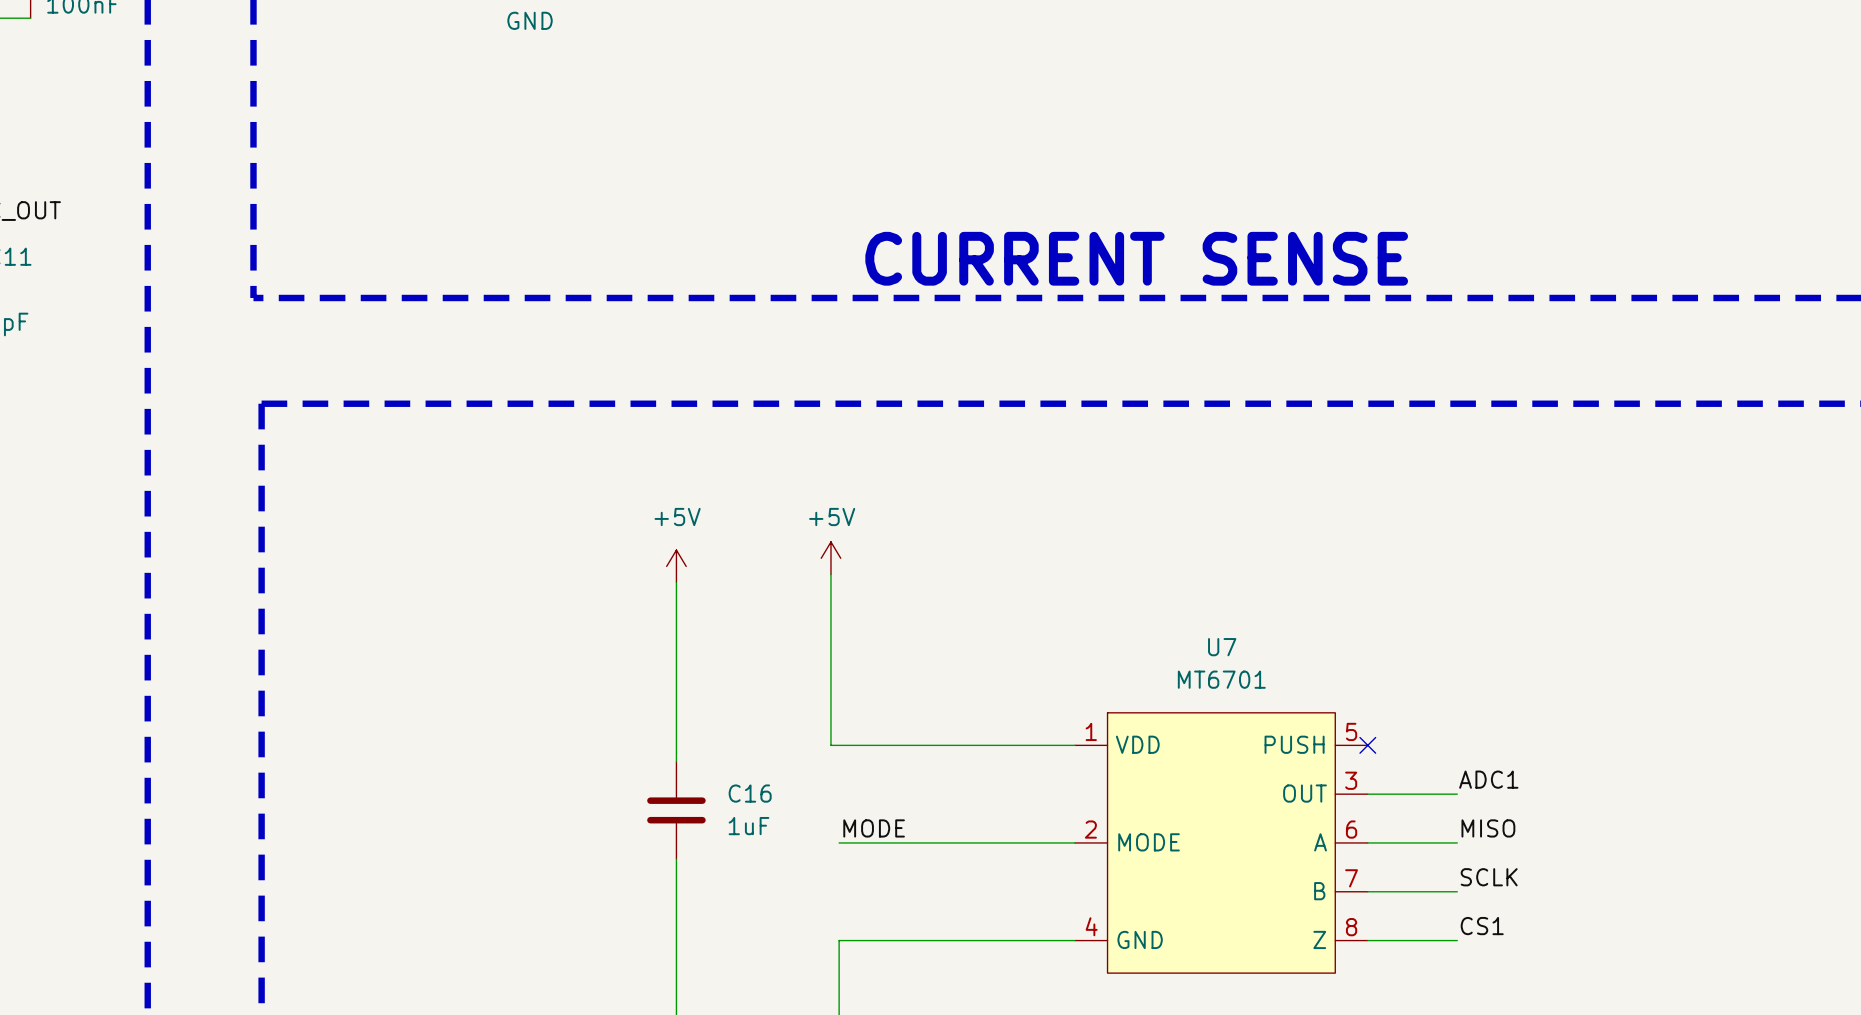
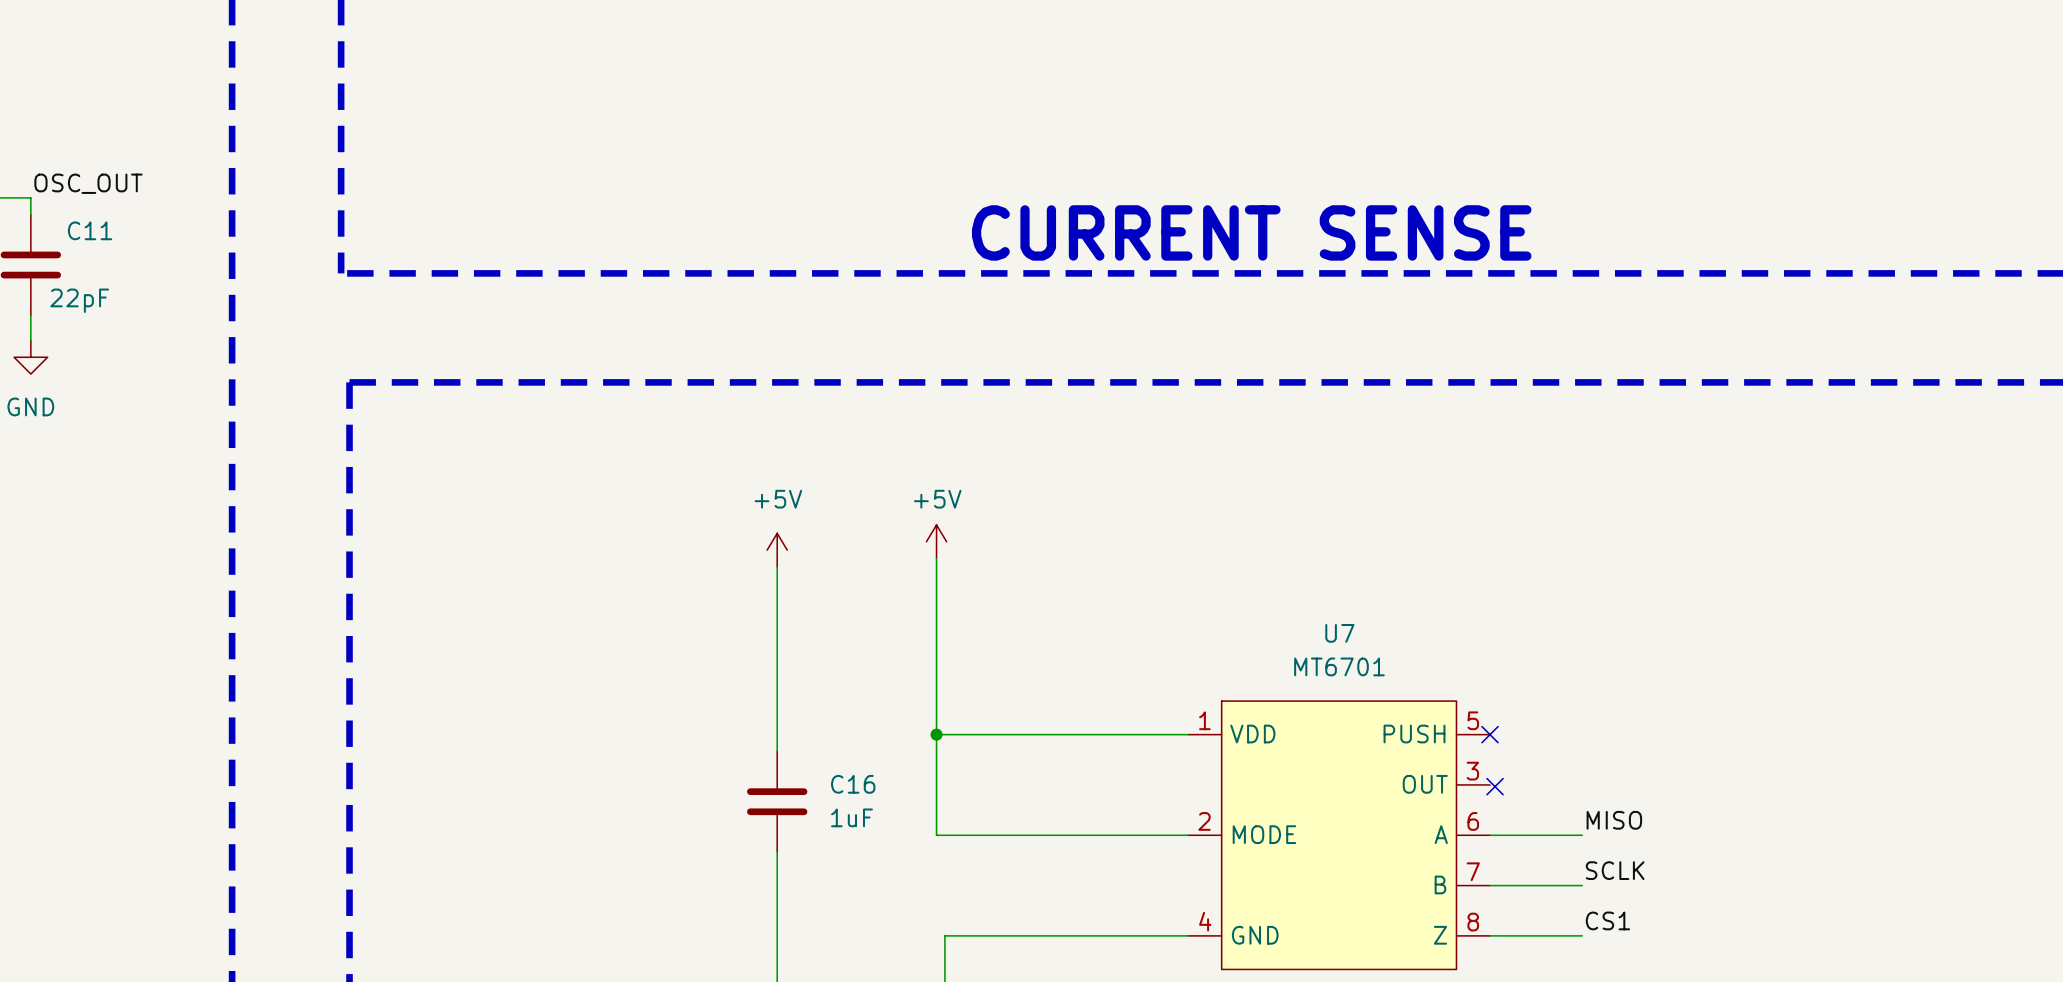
wire: none -> (936, 734) (936, 835) (944, 835)
junction: none -> (936, 734)
label: ADC1 (1488, 779) -> none
wire: (1367, 794) (1457, 794) -> none
no-connect mark: none -> (1495, 786)
label: MODE (874, 828) -> none

